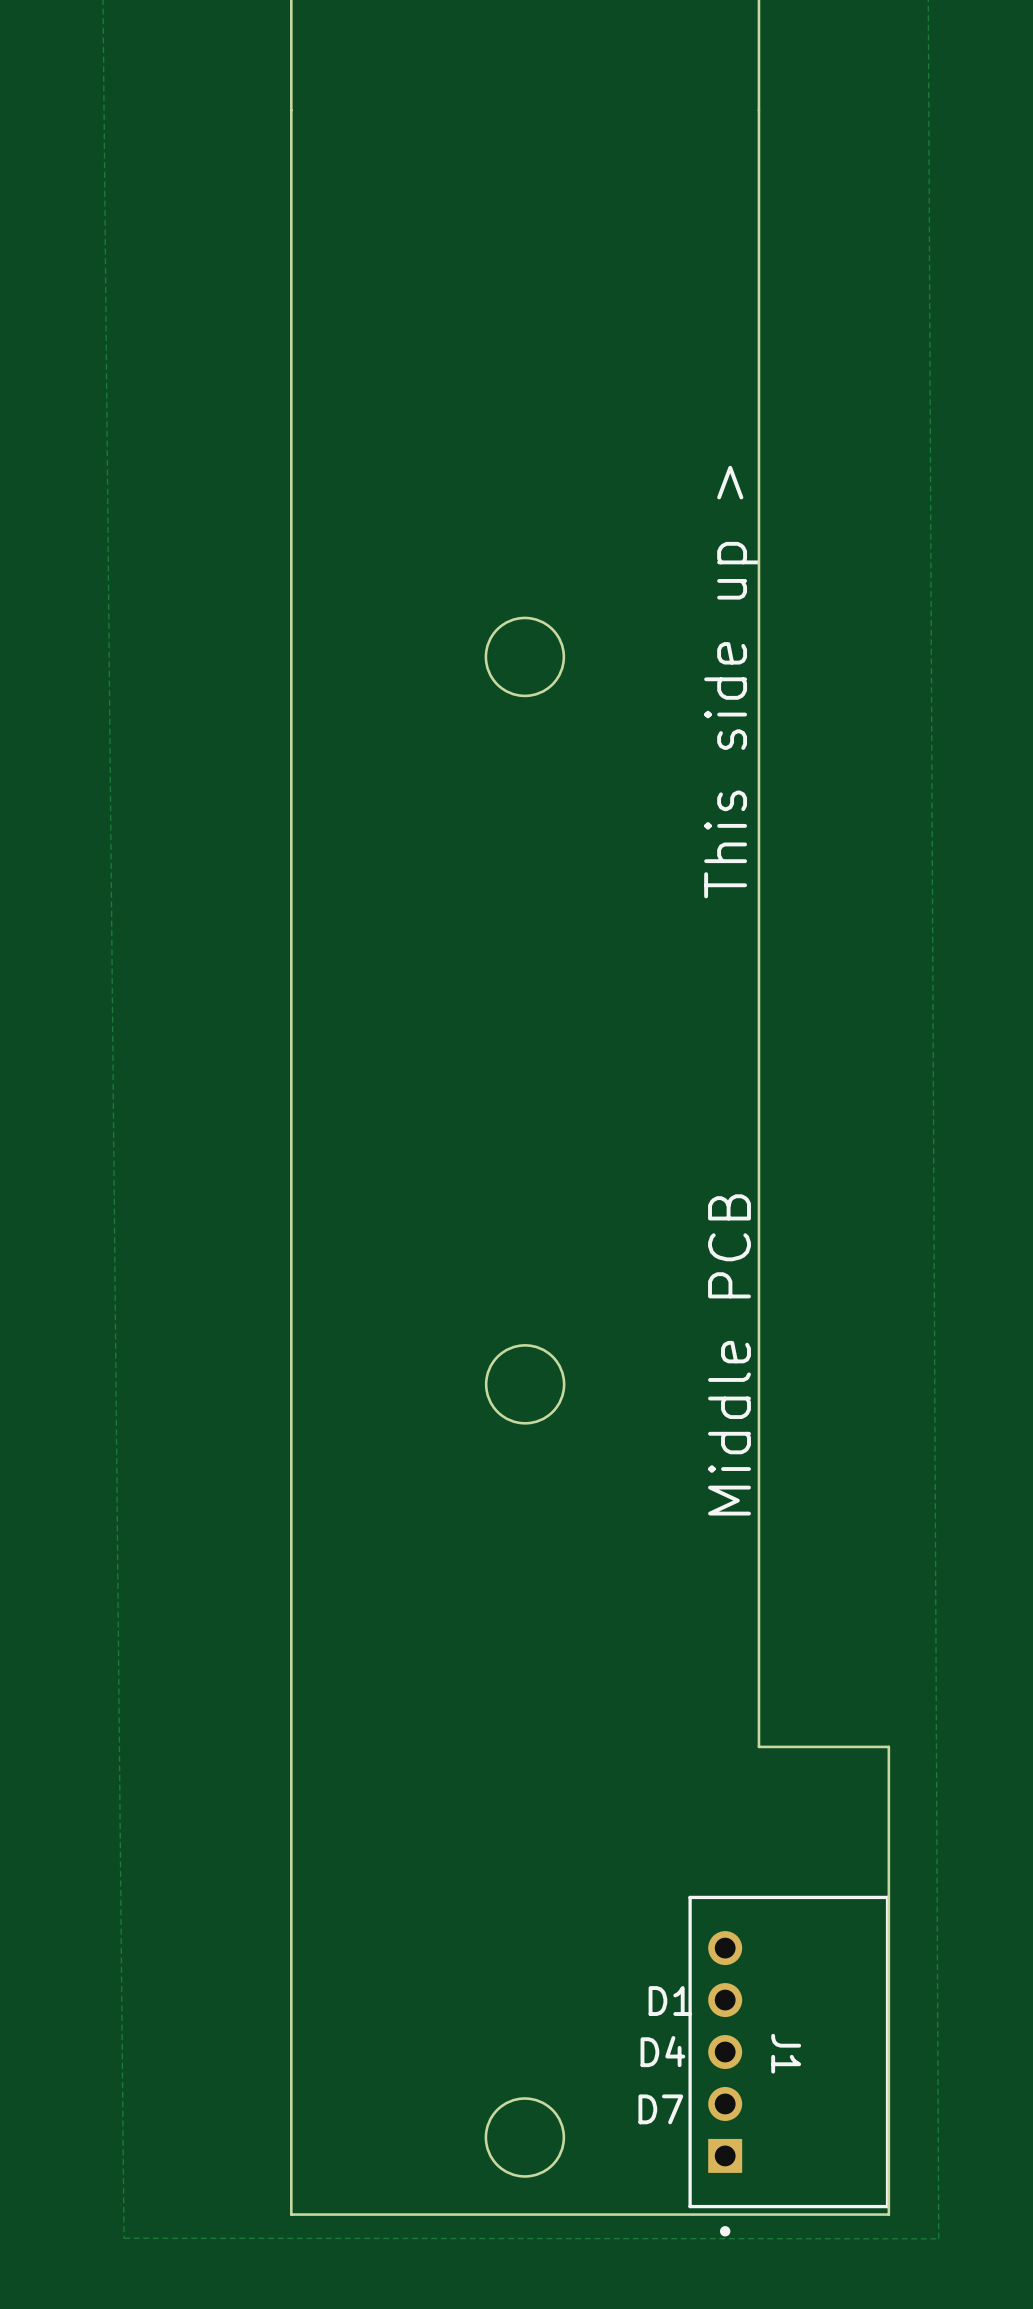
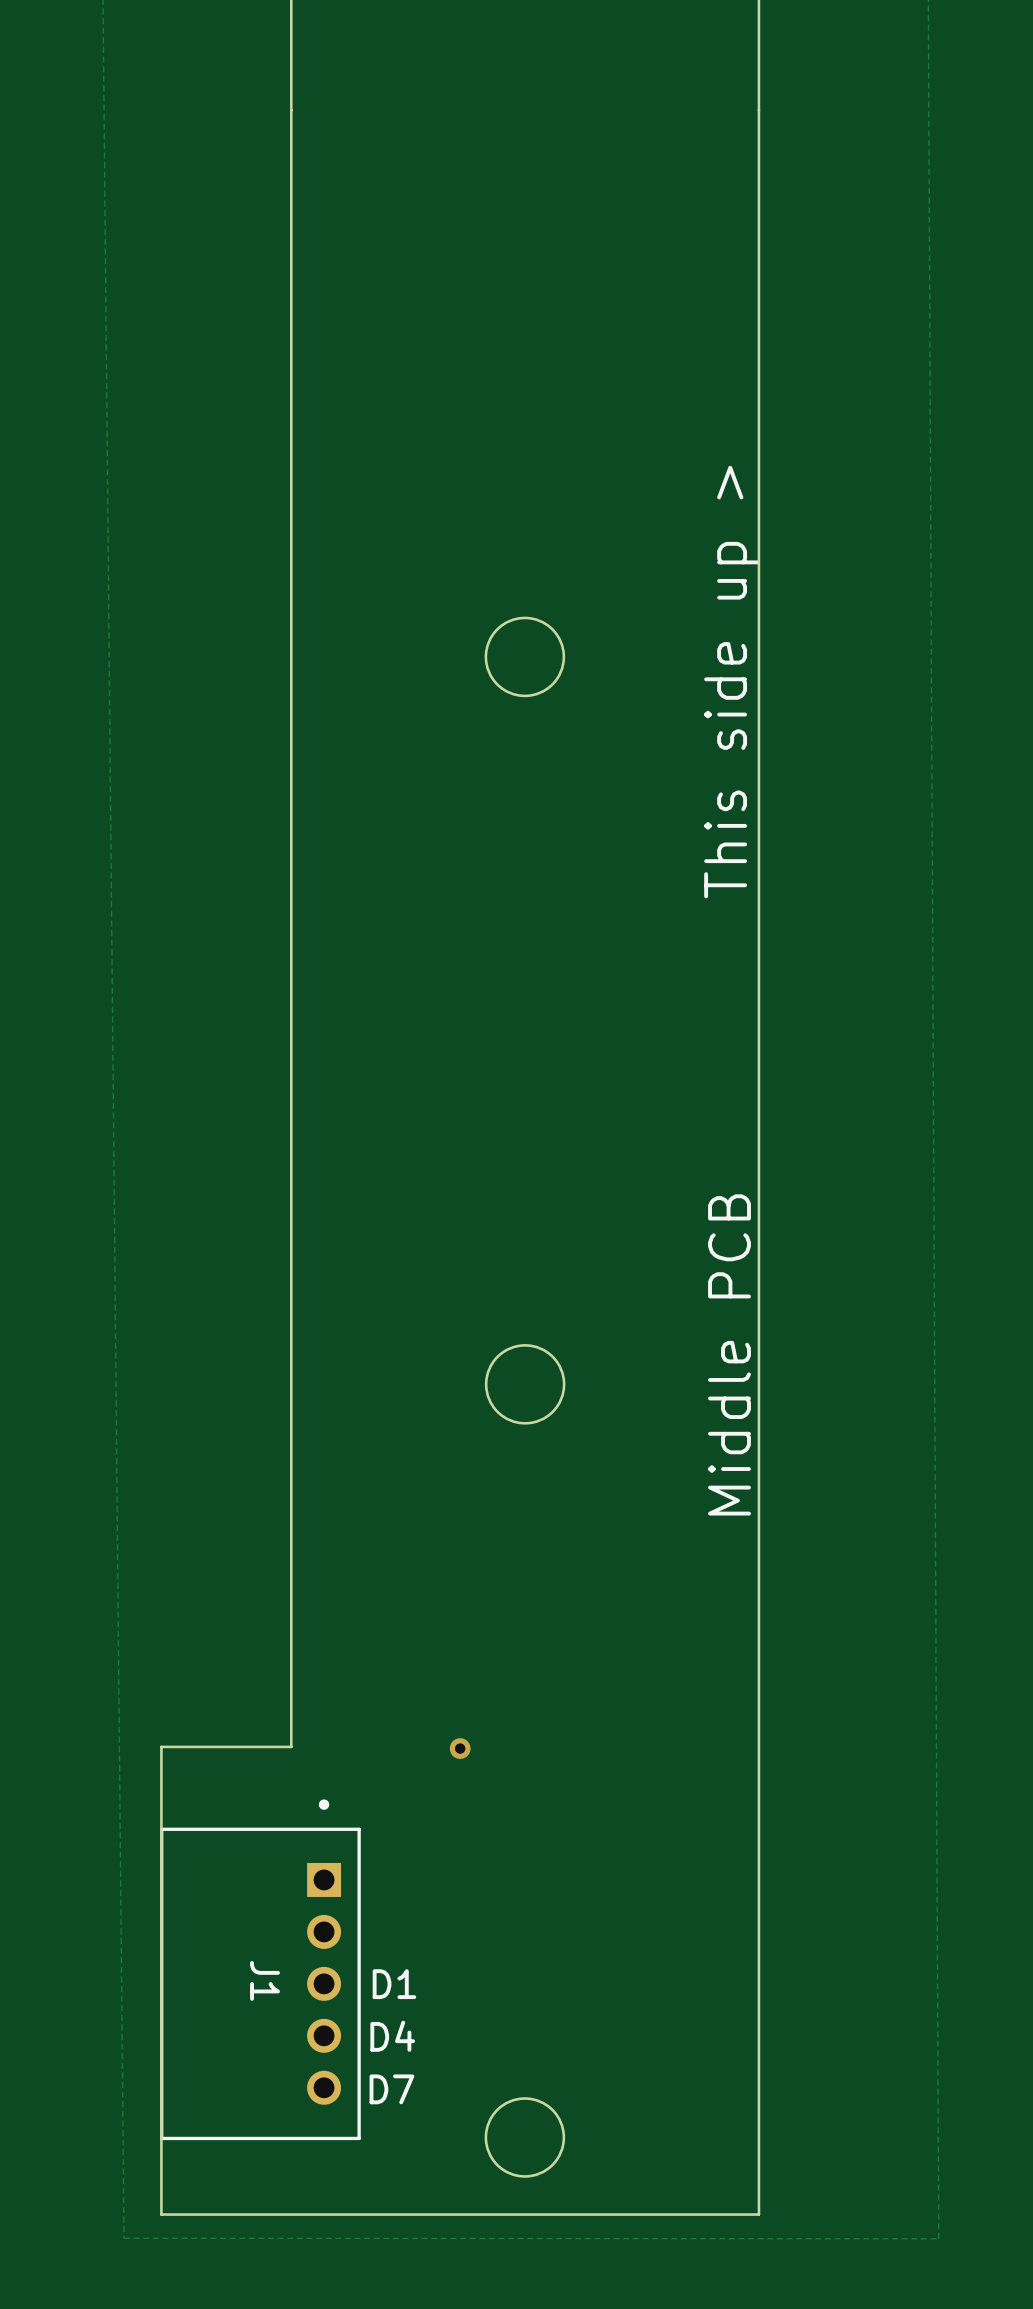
board edge: (291, 1746) (291, 2214) -> (291, 1746) (161, 1746) (161, 2214) (291, 2214)
board edge: (758, 1746) (888, 1746) (888, 2214) (758, 2214) -> (758, 1746) (758, 2214)
via: none -> (460, 1748)
text position: D1 (670, 2001) -> D1 (394, 1984)
text position: D4 (662, 2051) -> D4 (392, 2036)
J1 rotation: 0° (788, 2066) -> 180° (260, 1969)
J1 position: (788, 2066) -> (260, 1969)
text position: D7 (660, 2109) -> D7 (391, 2089)

